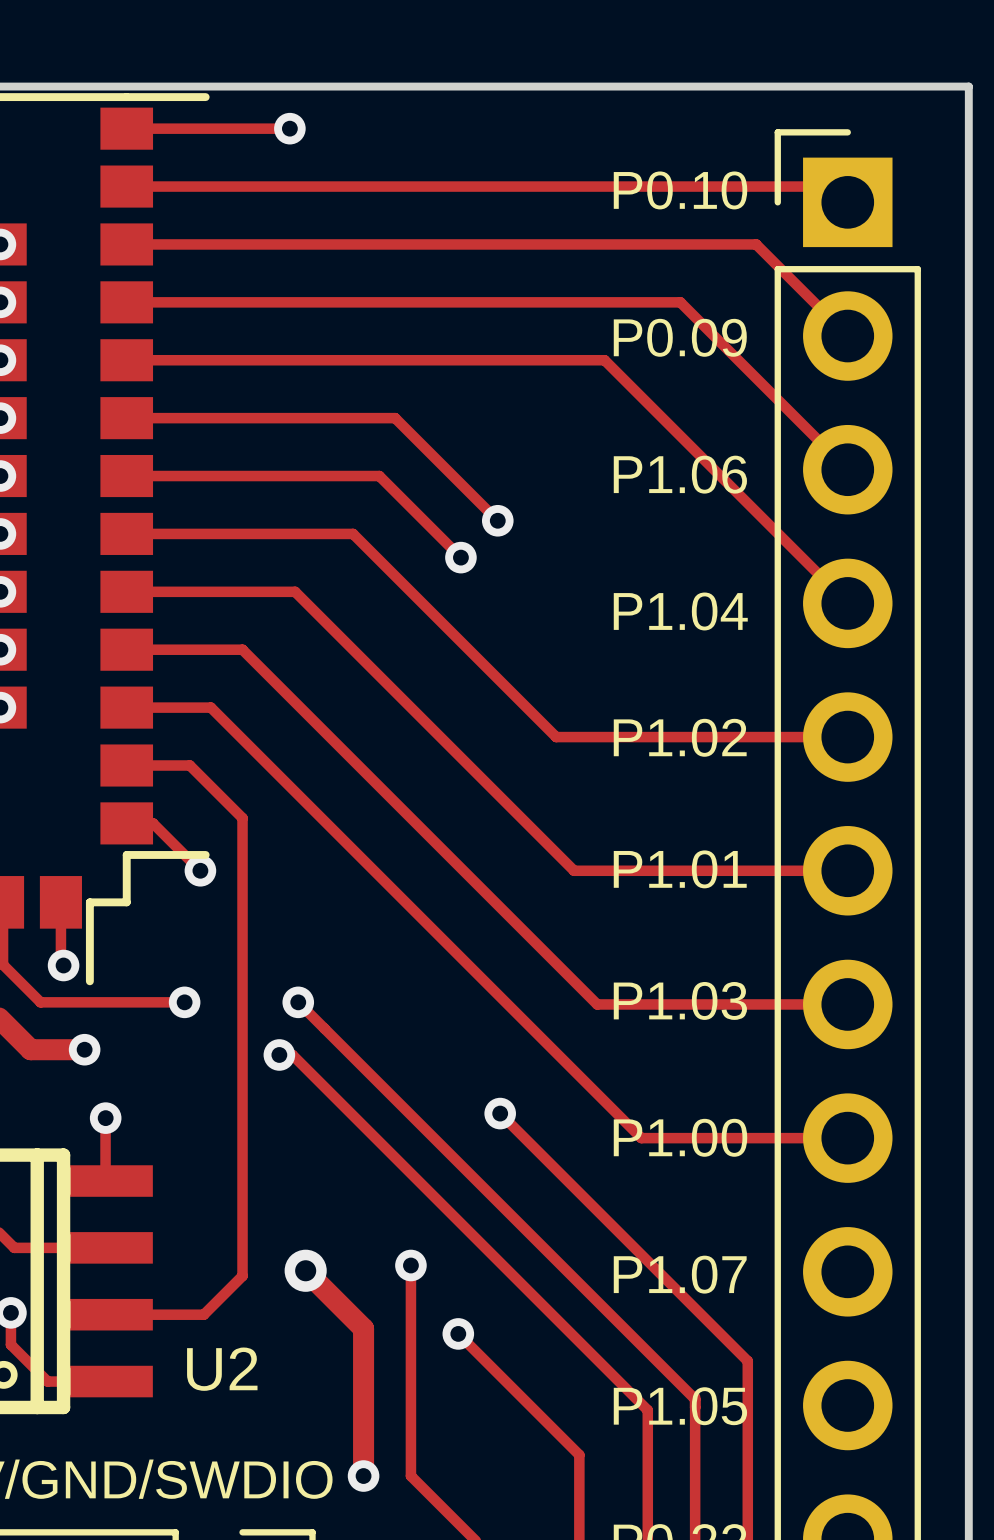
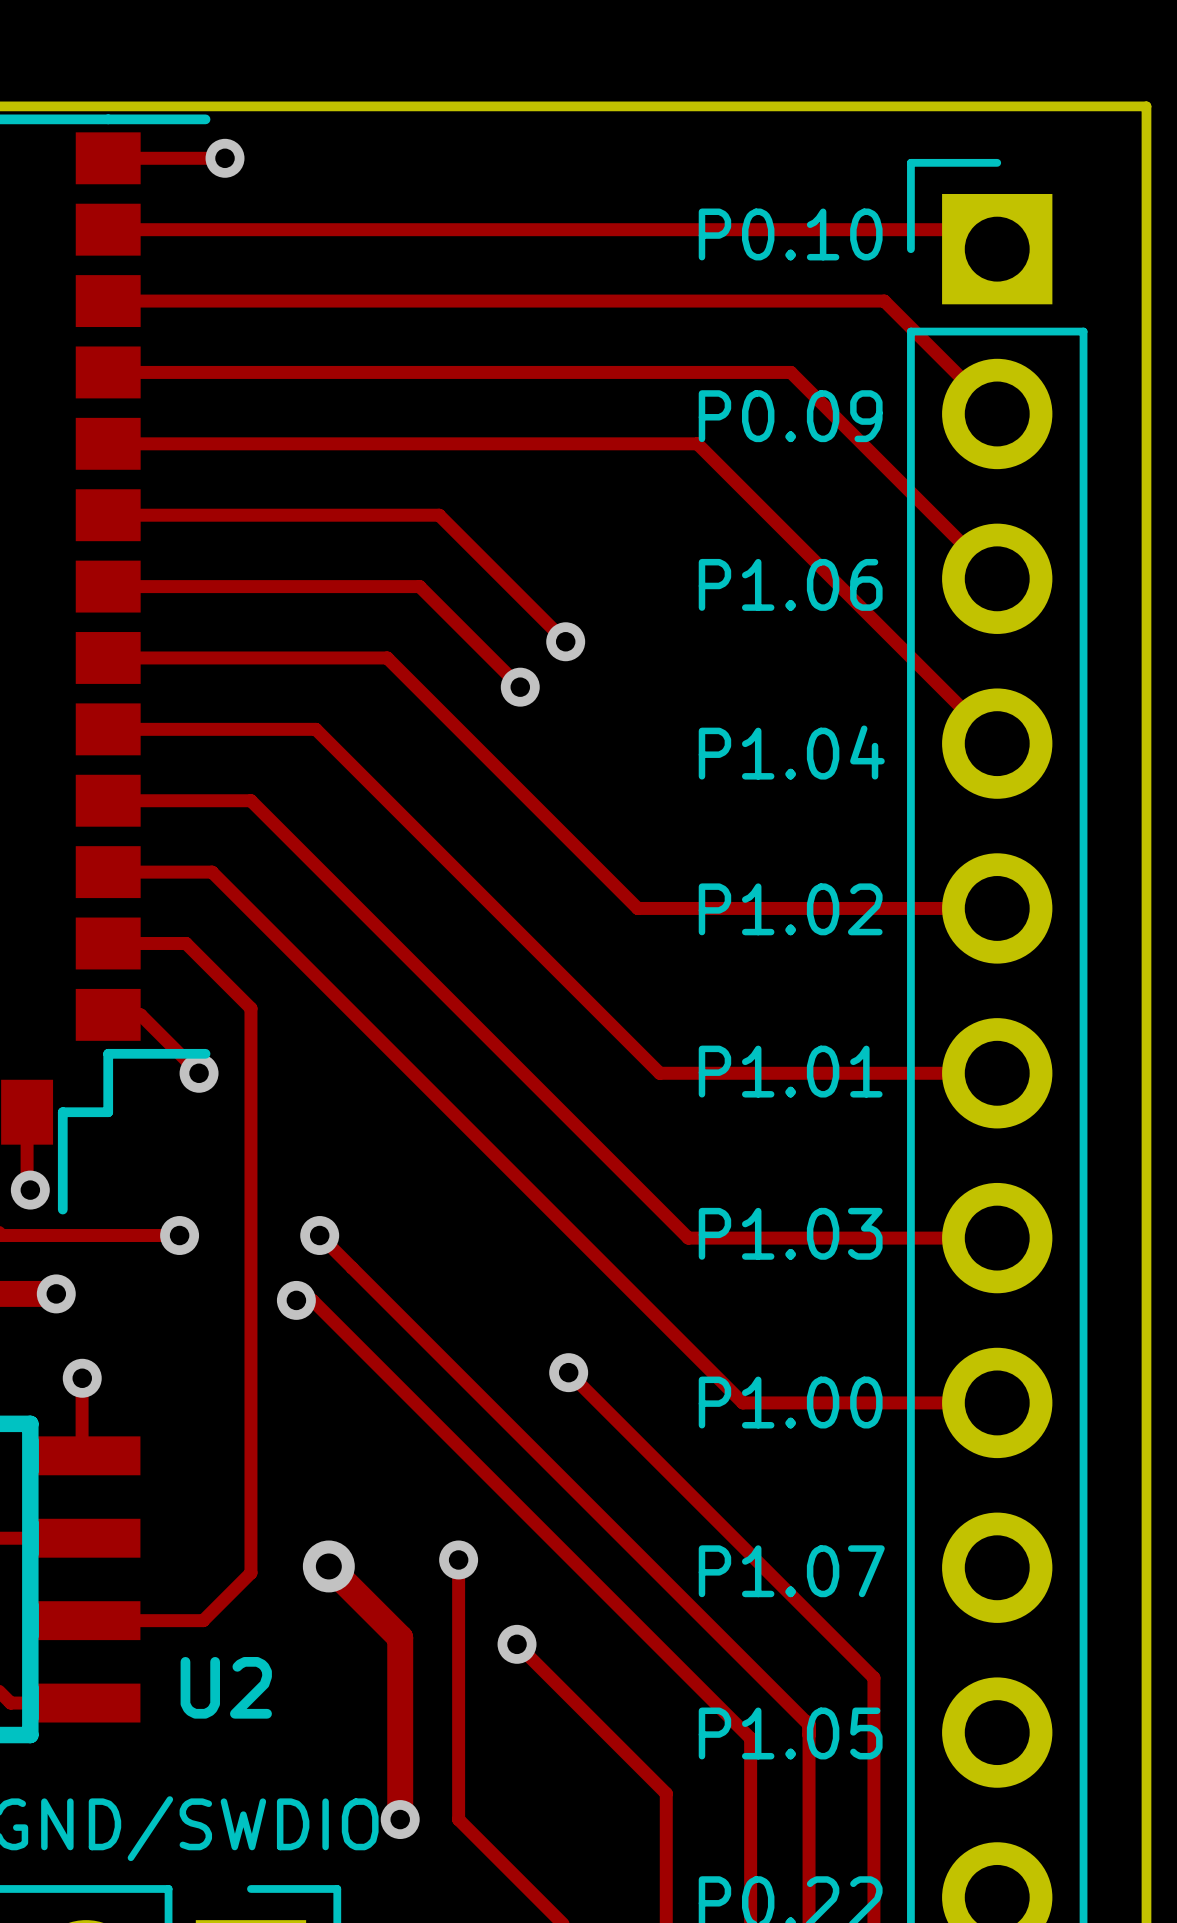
track: (221, 128) (289, 128) -> none
via position: (289, 128) -> (225, 158)

